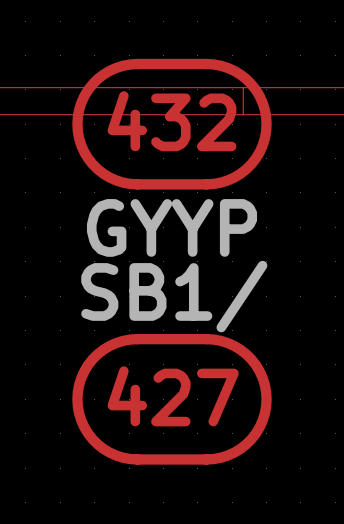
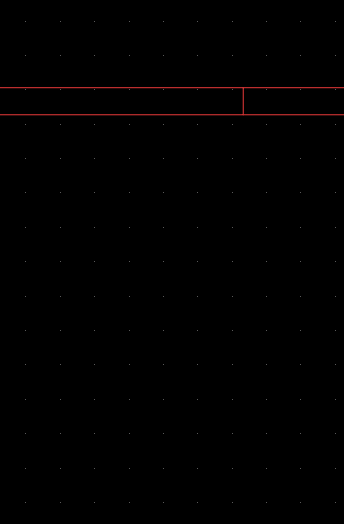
part: (172, 124) -> none
part: (172, 399) -> none

